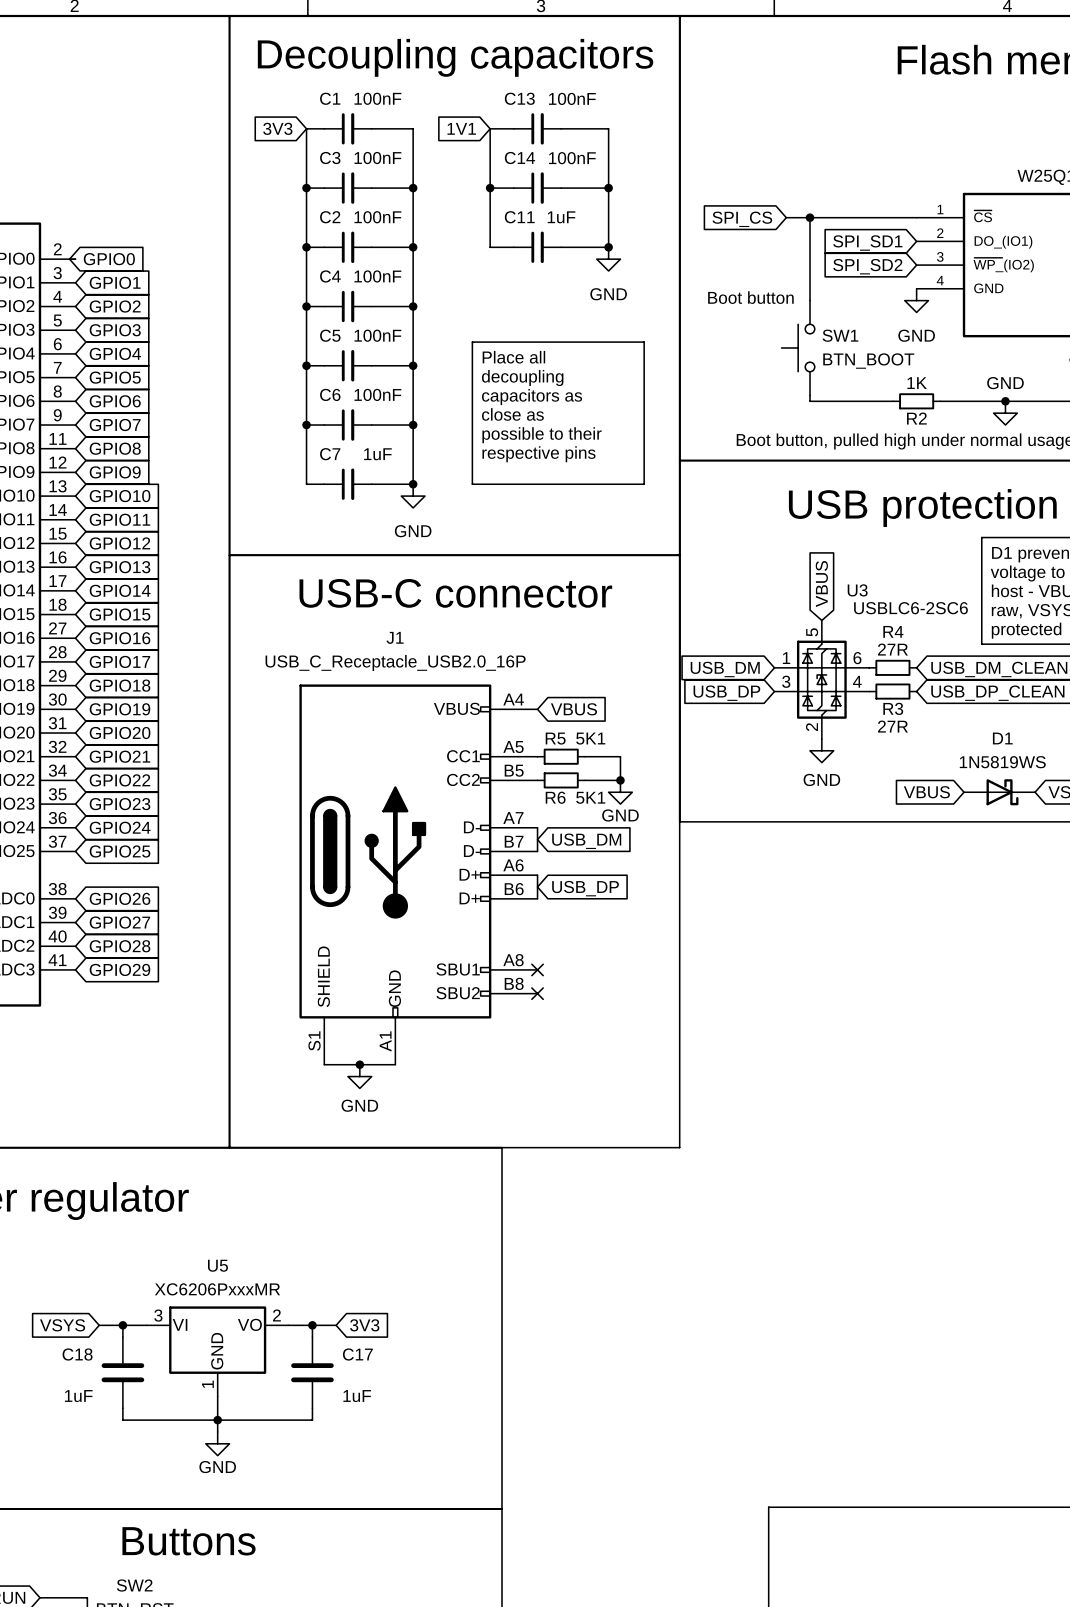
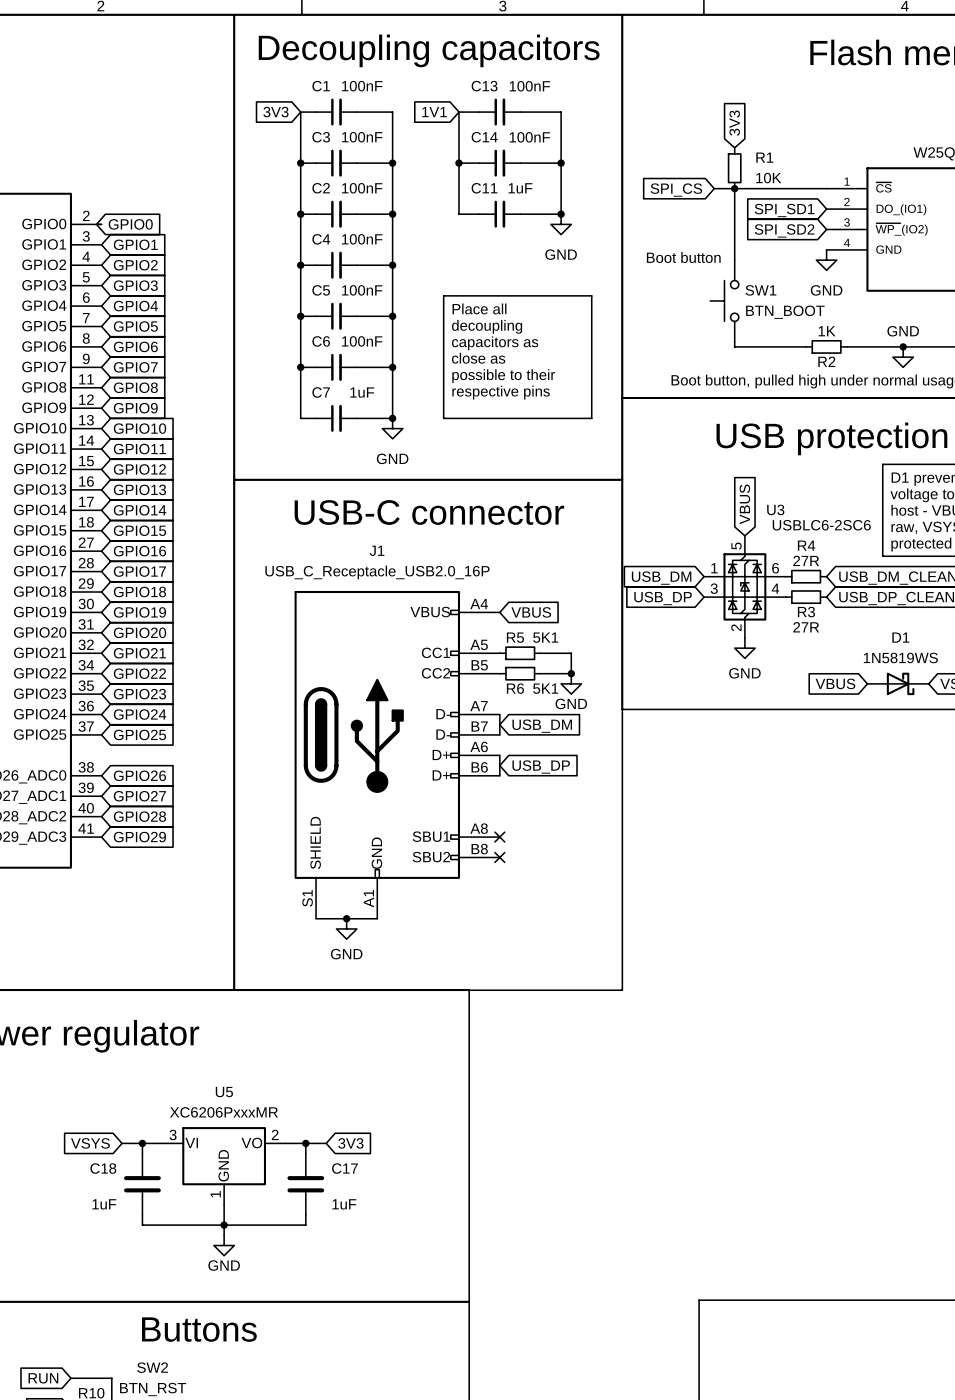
global label: none -> 3V3 (734, 123)
R1: none -> 10K (734, 168)

